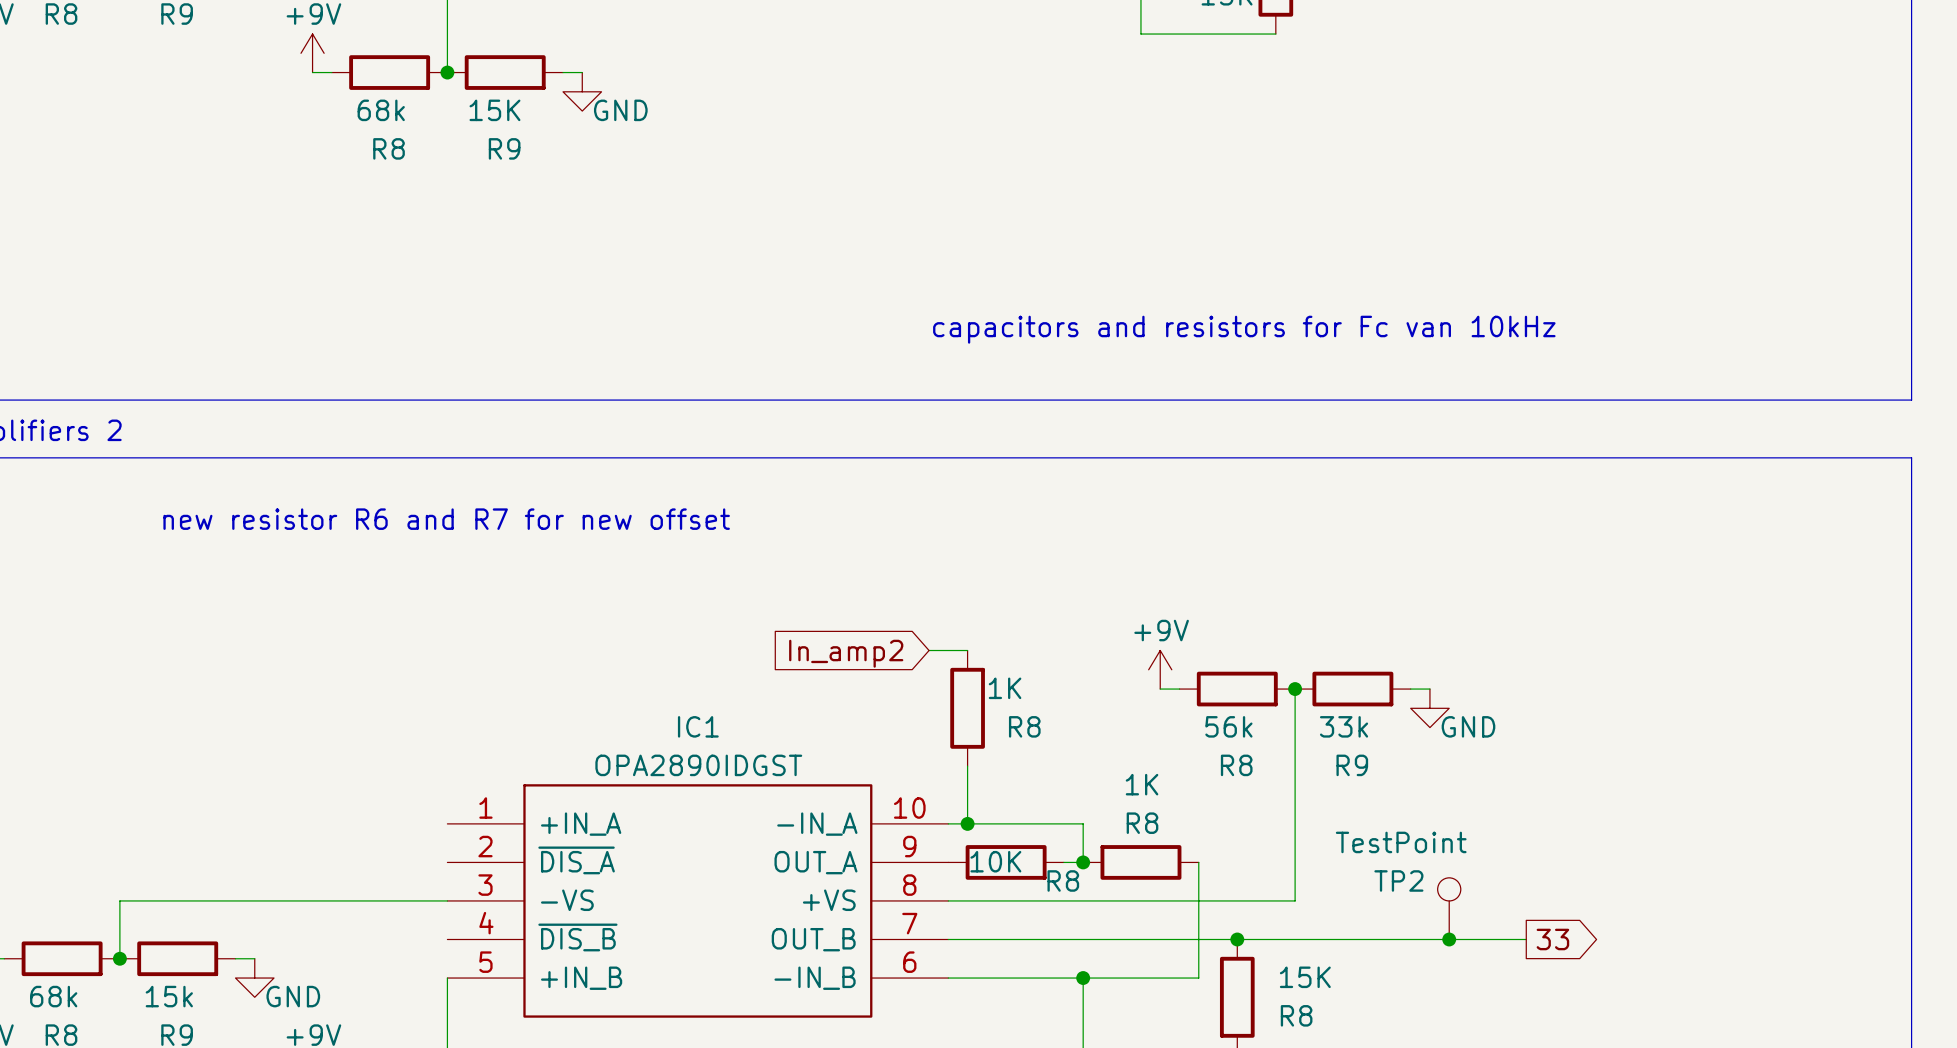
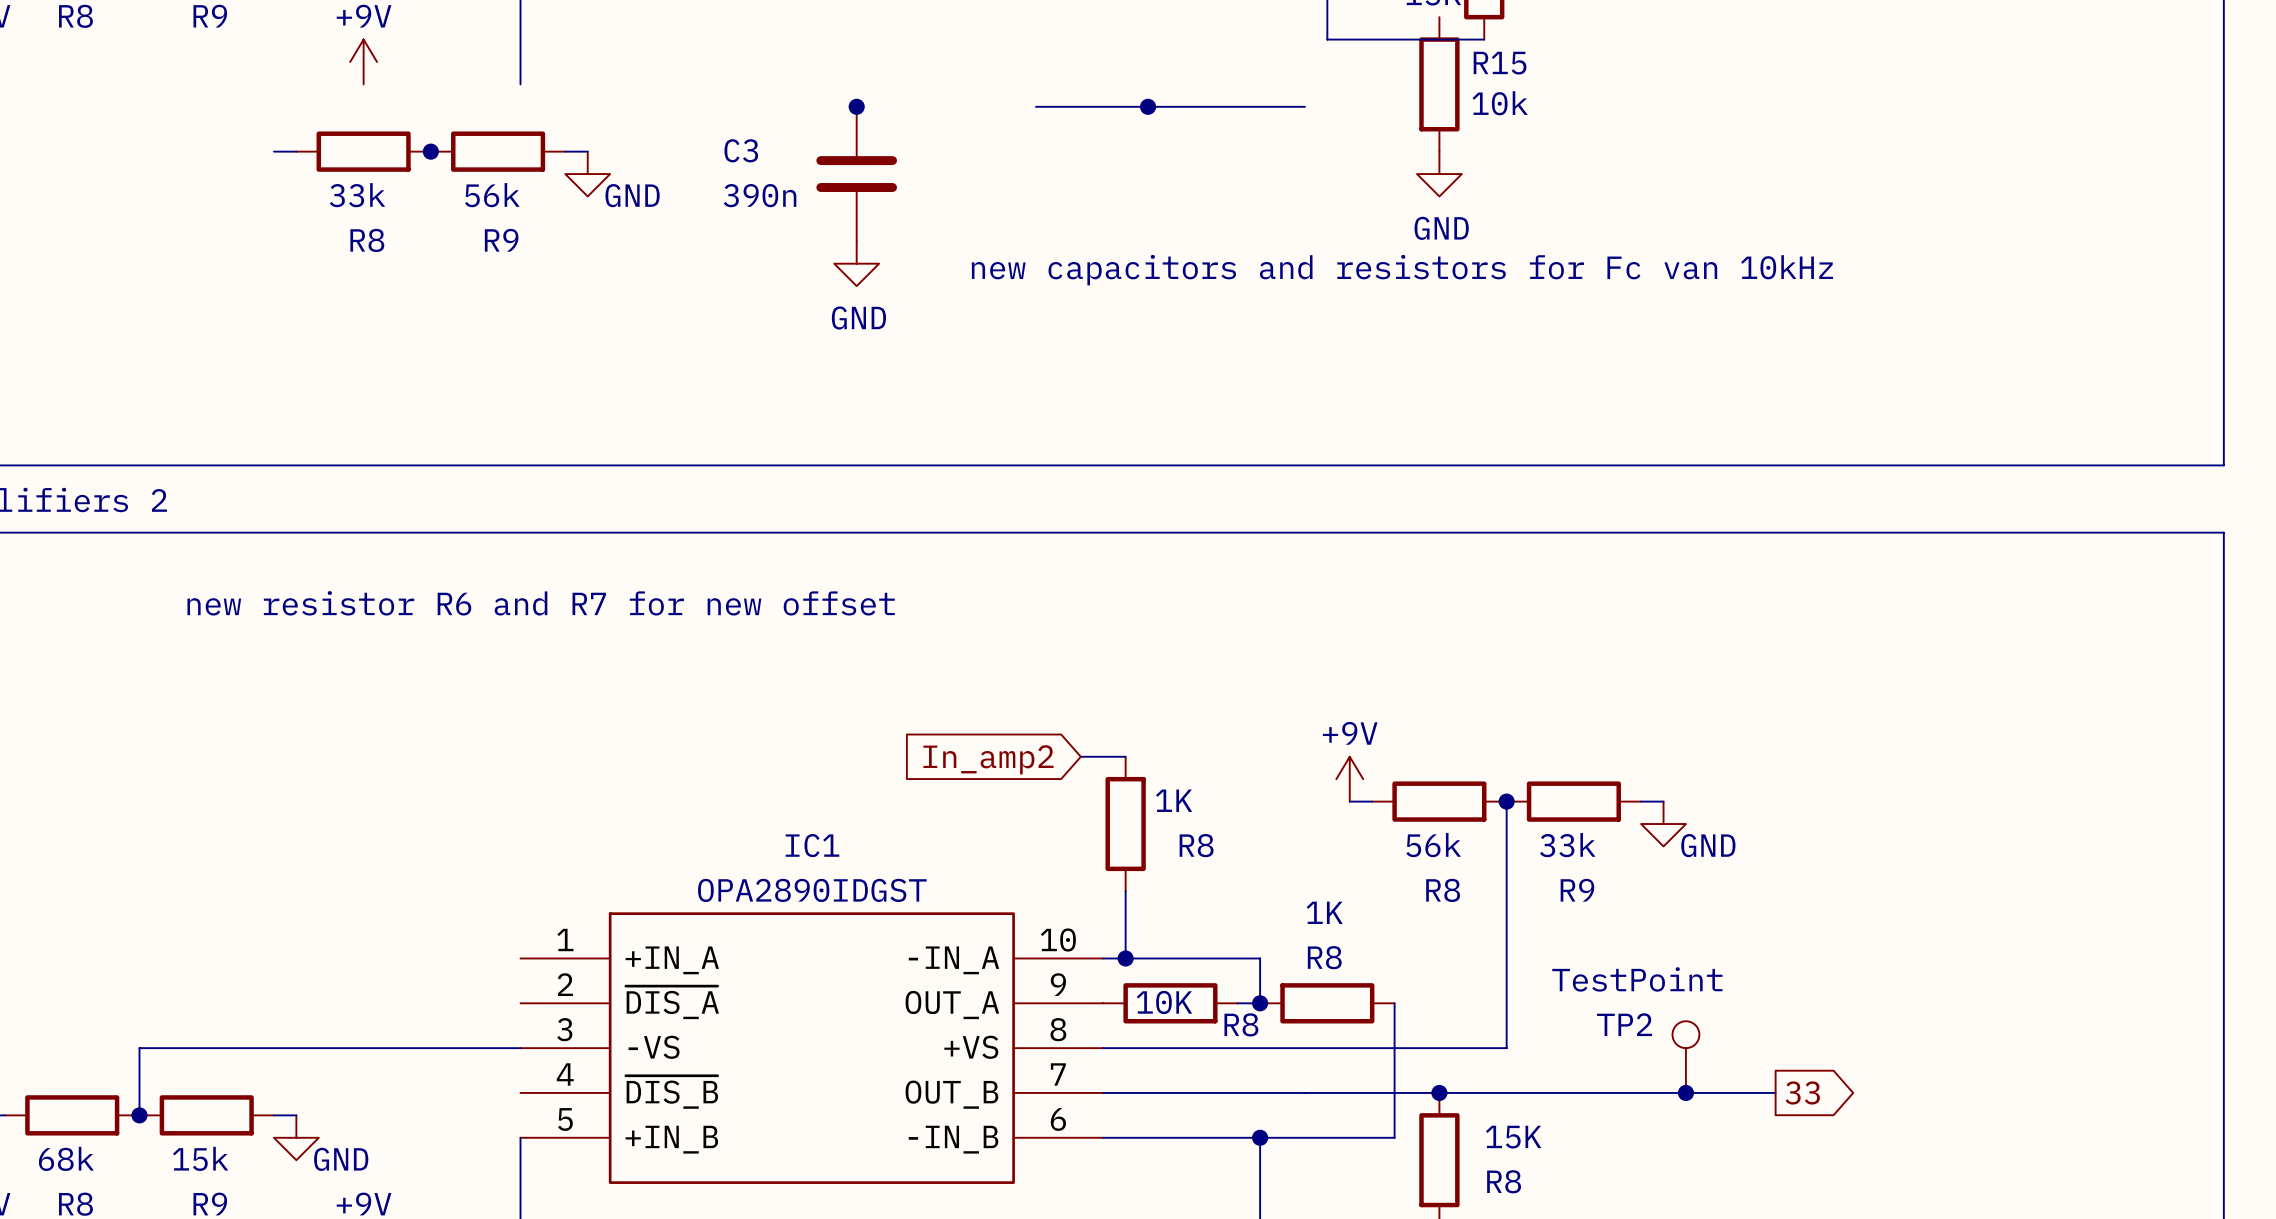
wire: (312, 72) (331, 72) -> (273, 151) (296, 151)
R8: 68k (389, 72) -> none
junction: (447, 72) -> none
R9: 15K (505, 72) -> none
wire: (563, 72) (582, 72) -> (565, 151) (587, 151)
R15: none -> 10k (1439, 84)
power symbol position: GND (582, 91) -> GND (587, 174)
junction: none -> (856, 106)
wire: none -> (1035, 106) (1304, 106)
junction: none -> (1148, 106)
R8: none -> 33k (363, 151)
junction: none -> (430, 151)
R9: none -> 56k (498, 151)
C3: none -> 390n (856, 174)
power symbol: none -> GND (1439, 174)
power symbol: none -> GND (856, 263)
text: none -> new capacitors and resistors for Fc van 10kHz (1402, 270)
text: capacitors and resistors for Fc van 10kHz (1244, 329) -> none

